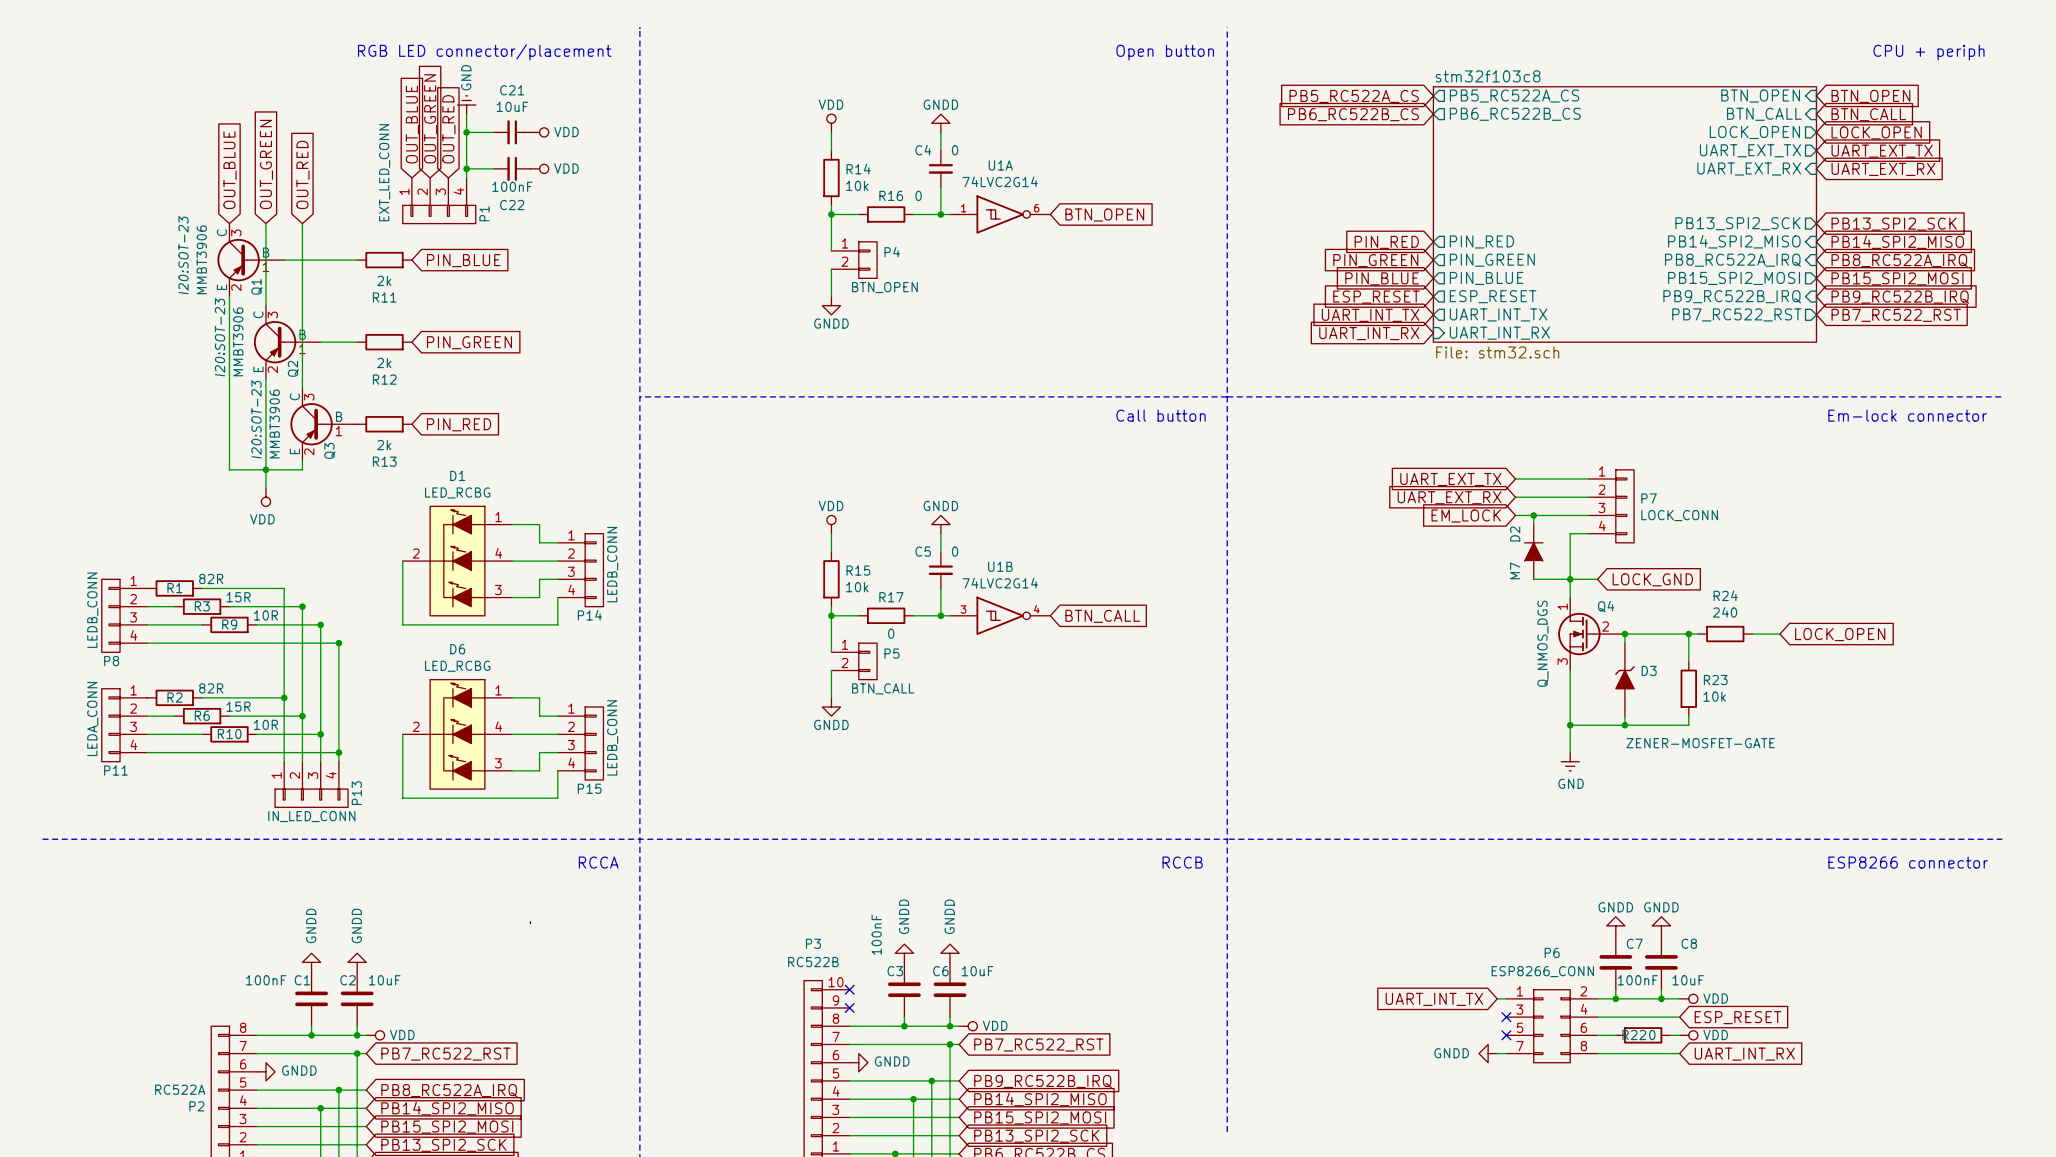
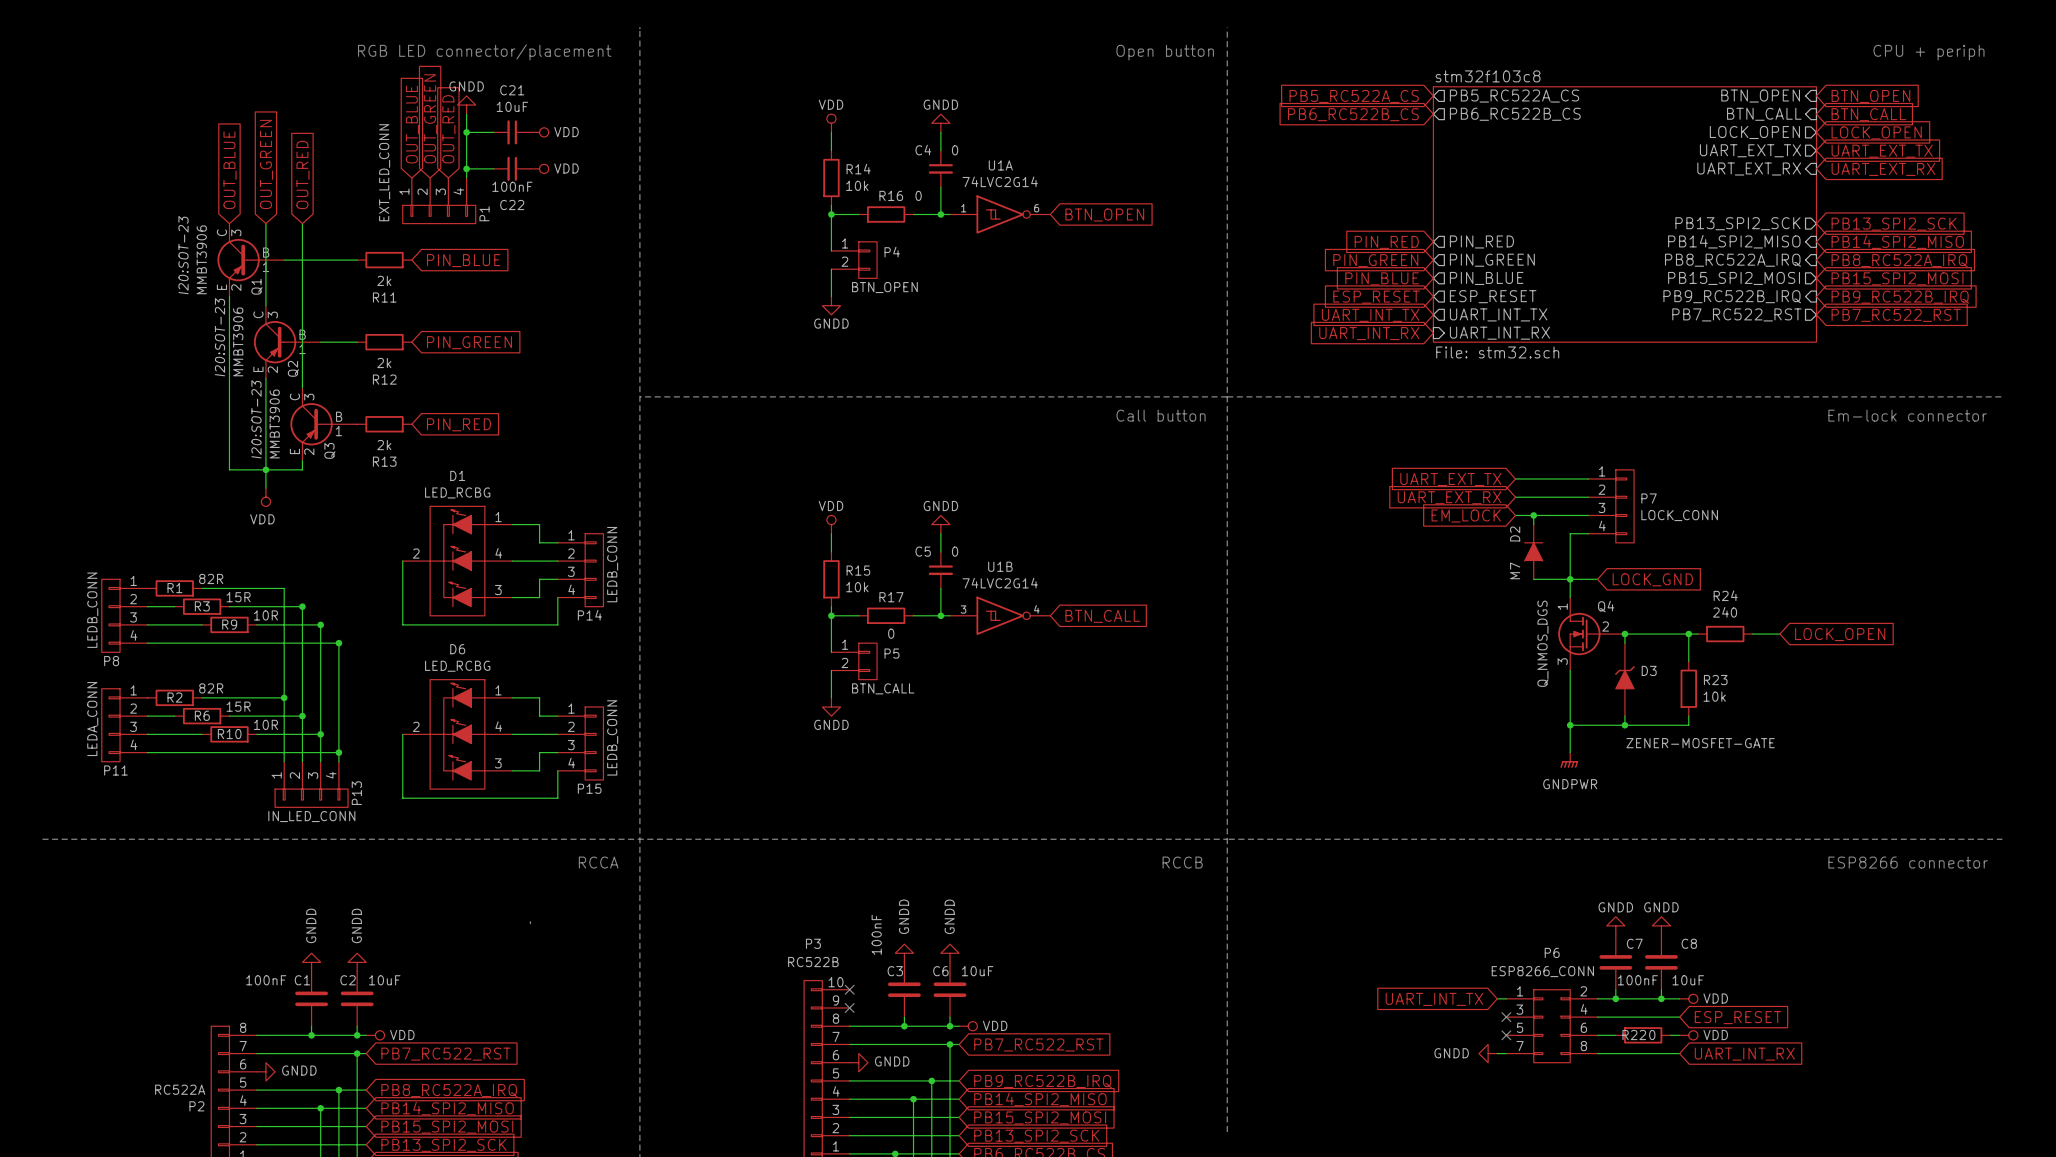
power symbol: GND (466, 105) -> GNDD (466, 105)
power symbol: GND (1570, 761) -> GNDPWR (1569, 760)

